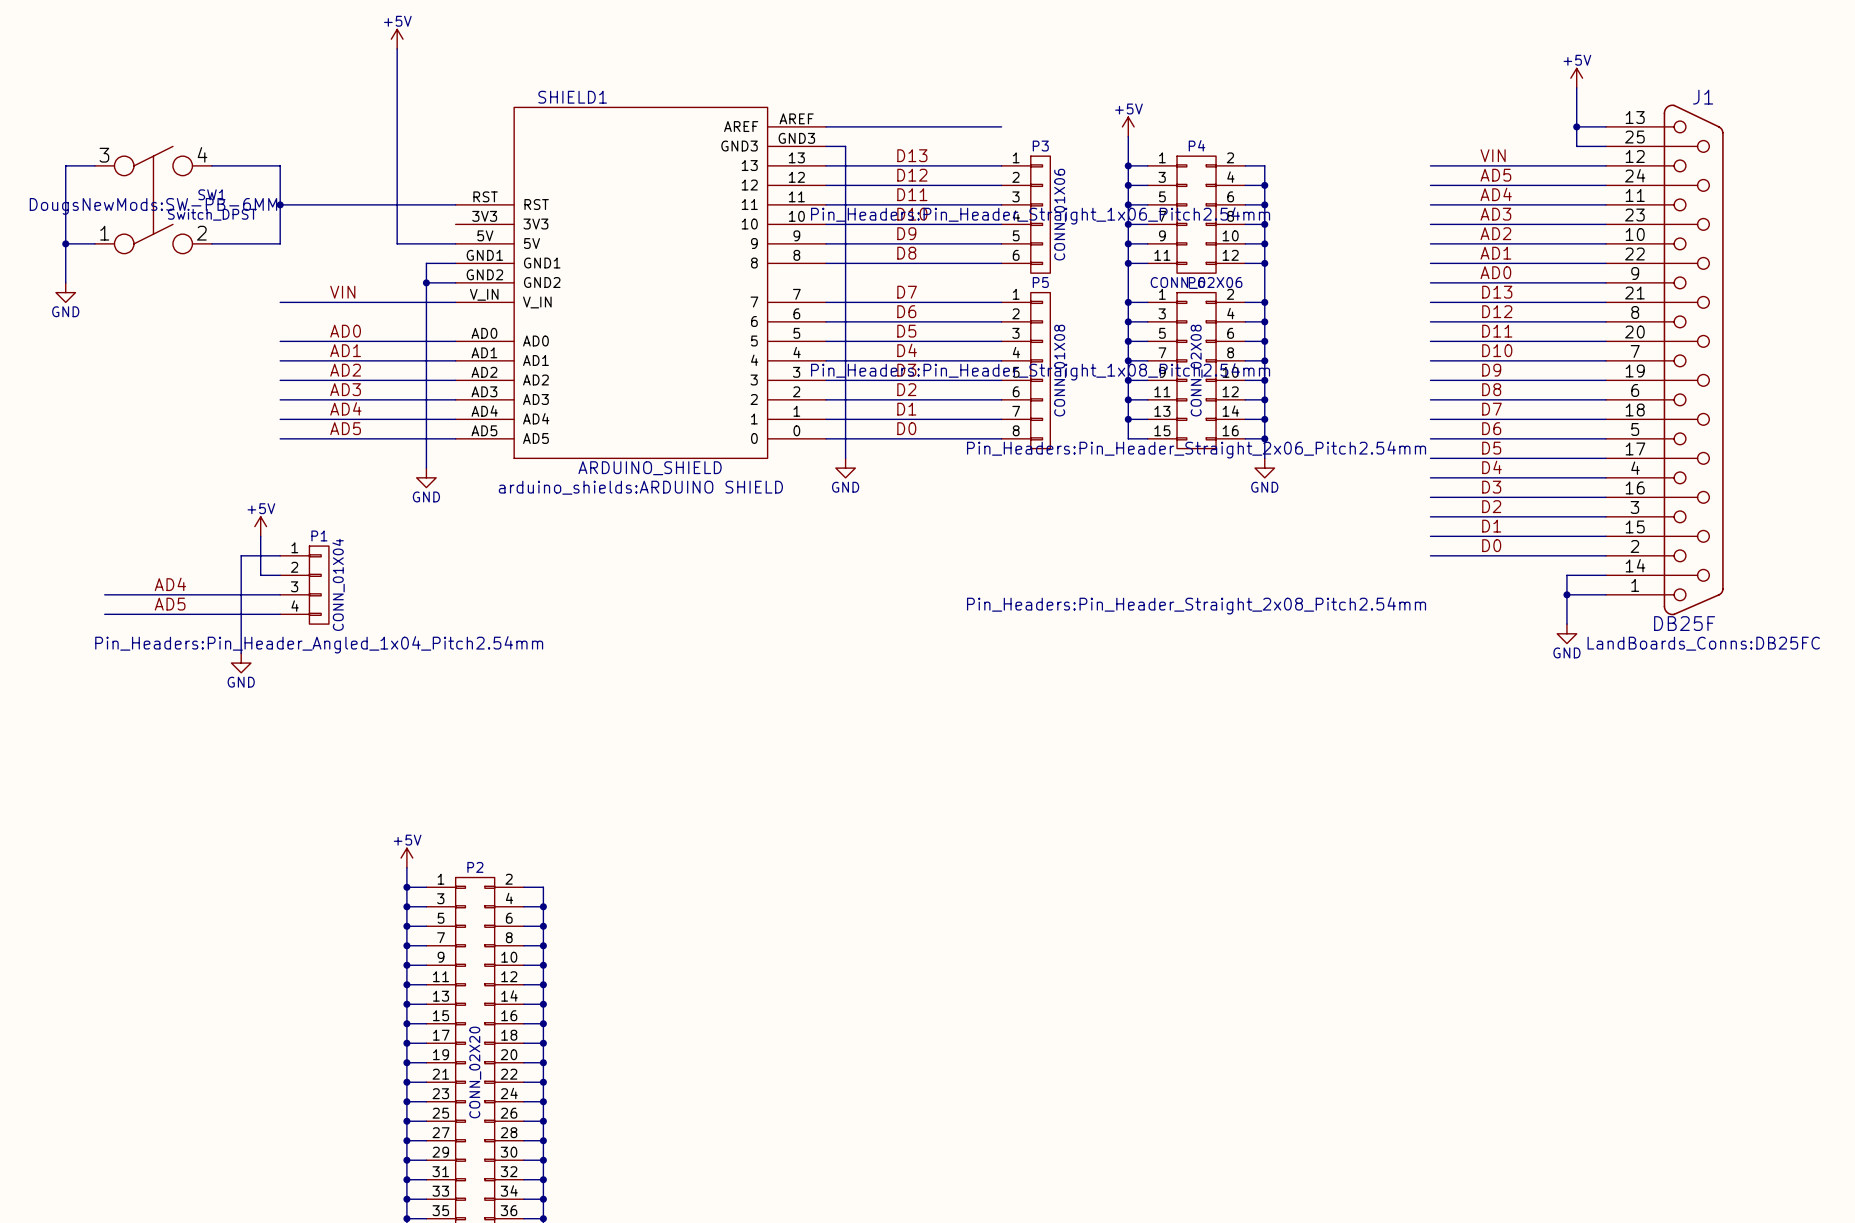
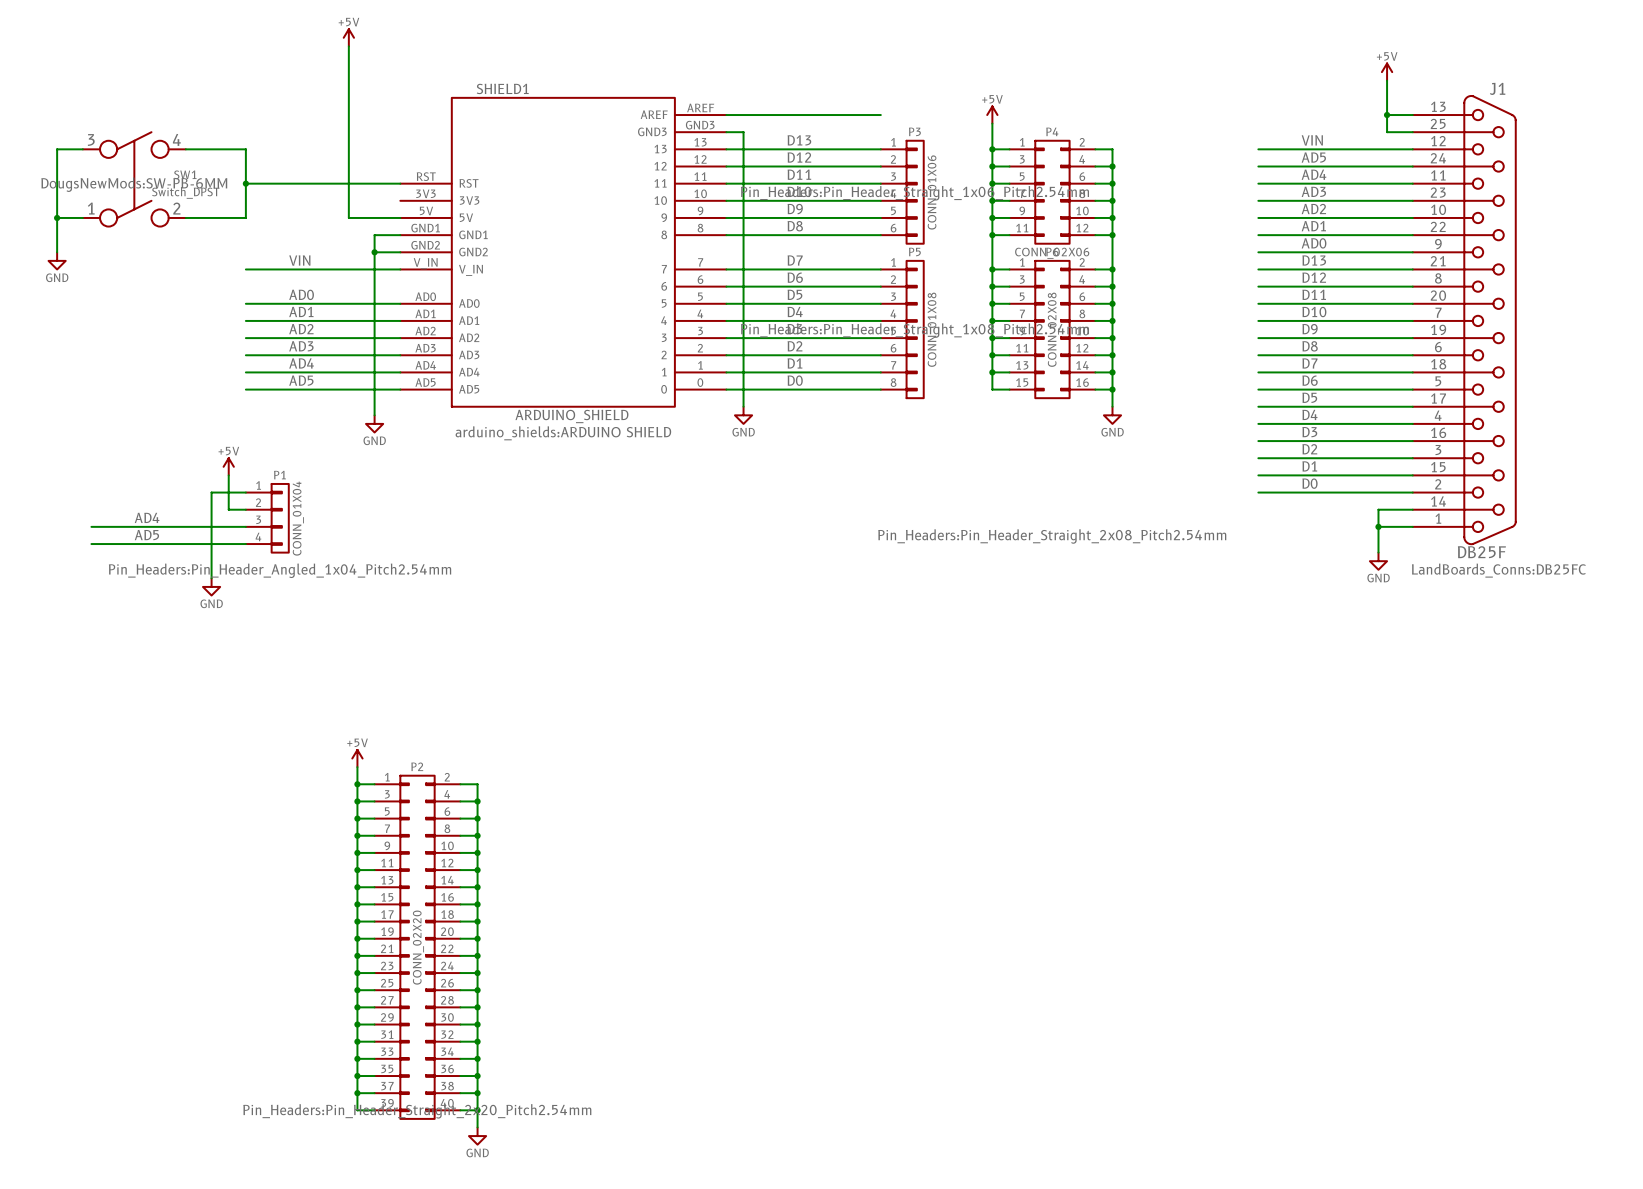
P4 text: Pin_Headers:Pin_Header_Straight_2x06_Pitch2.54mm (1196, 449) -> none

